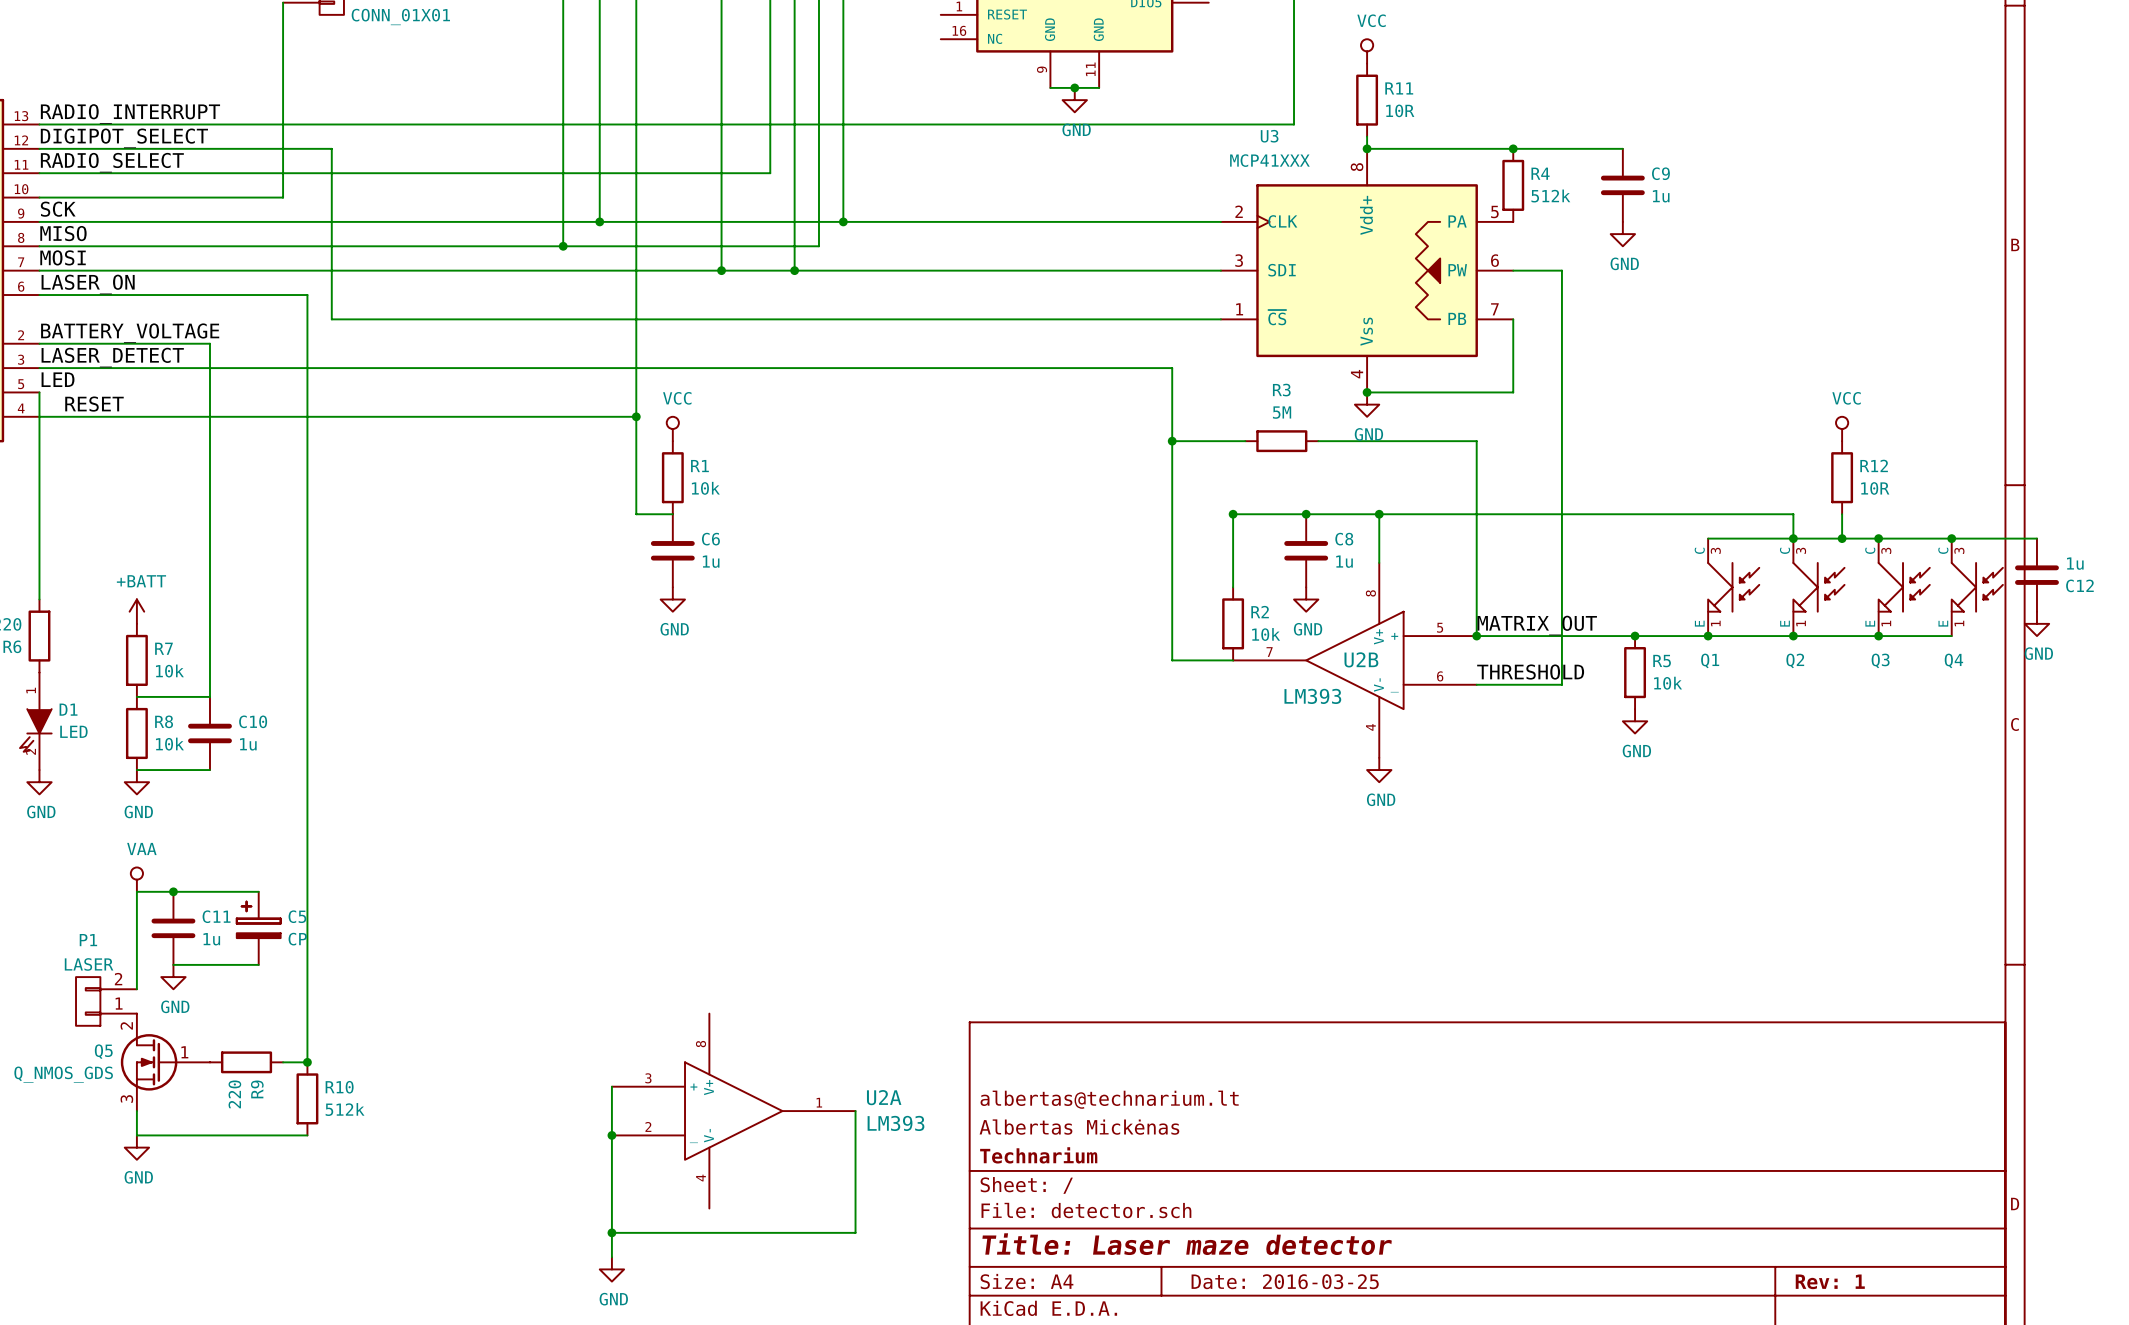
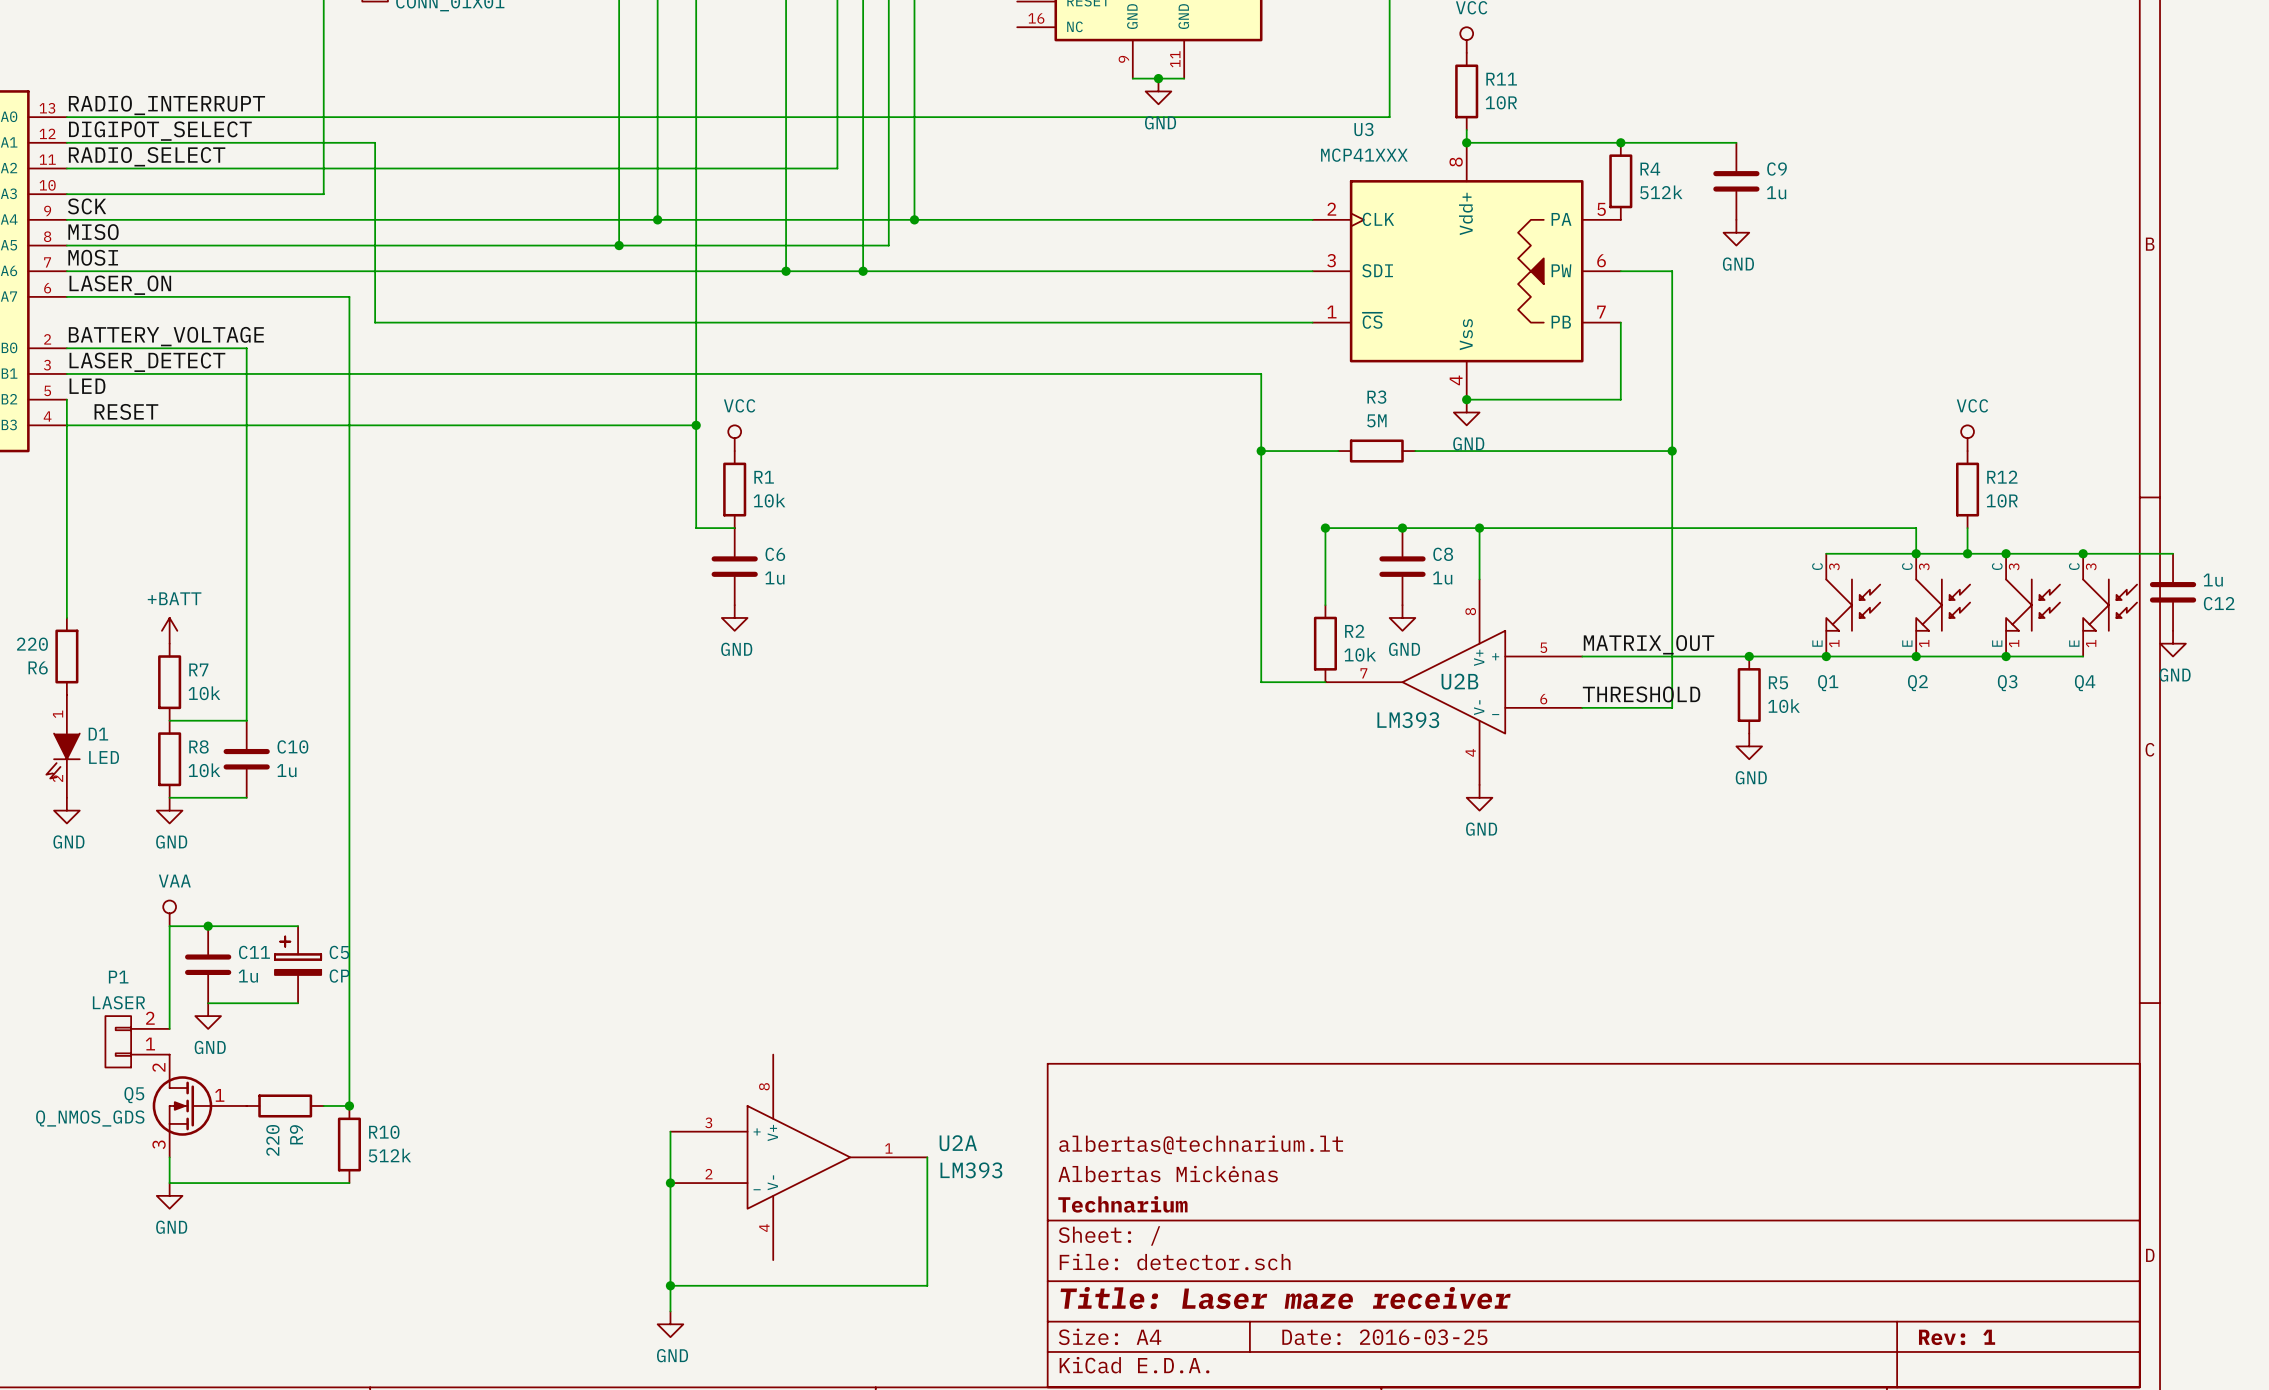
wire: (1476, 441) (1476, 636) -> (1582, 451) (1672, 451)
junction: none -> (1672, 451)
junction: (1476, 636) -> none
title block: Title: Laser maze detector (1187, 1244) -> Title: Laser maze receiver (1285, 1298)

